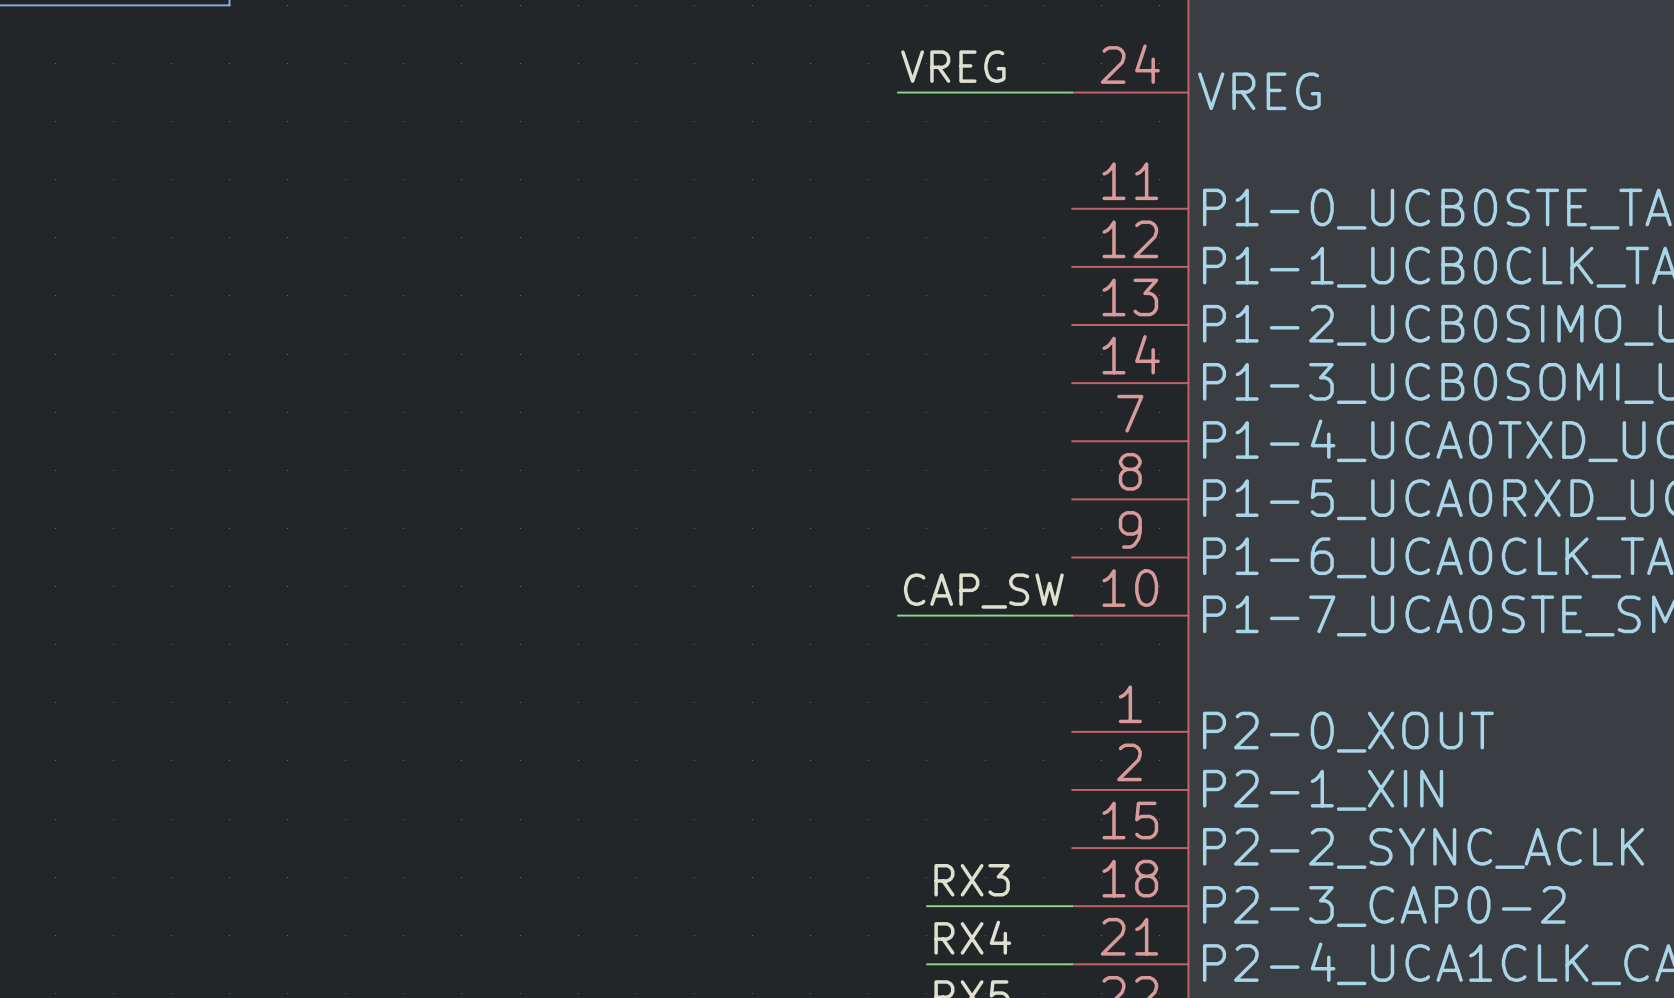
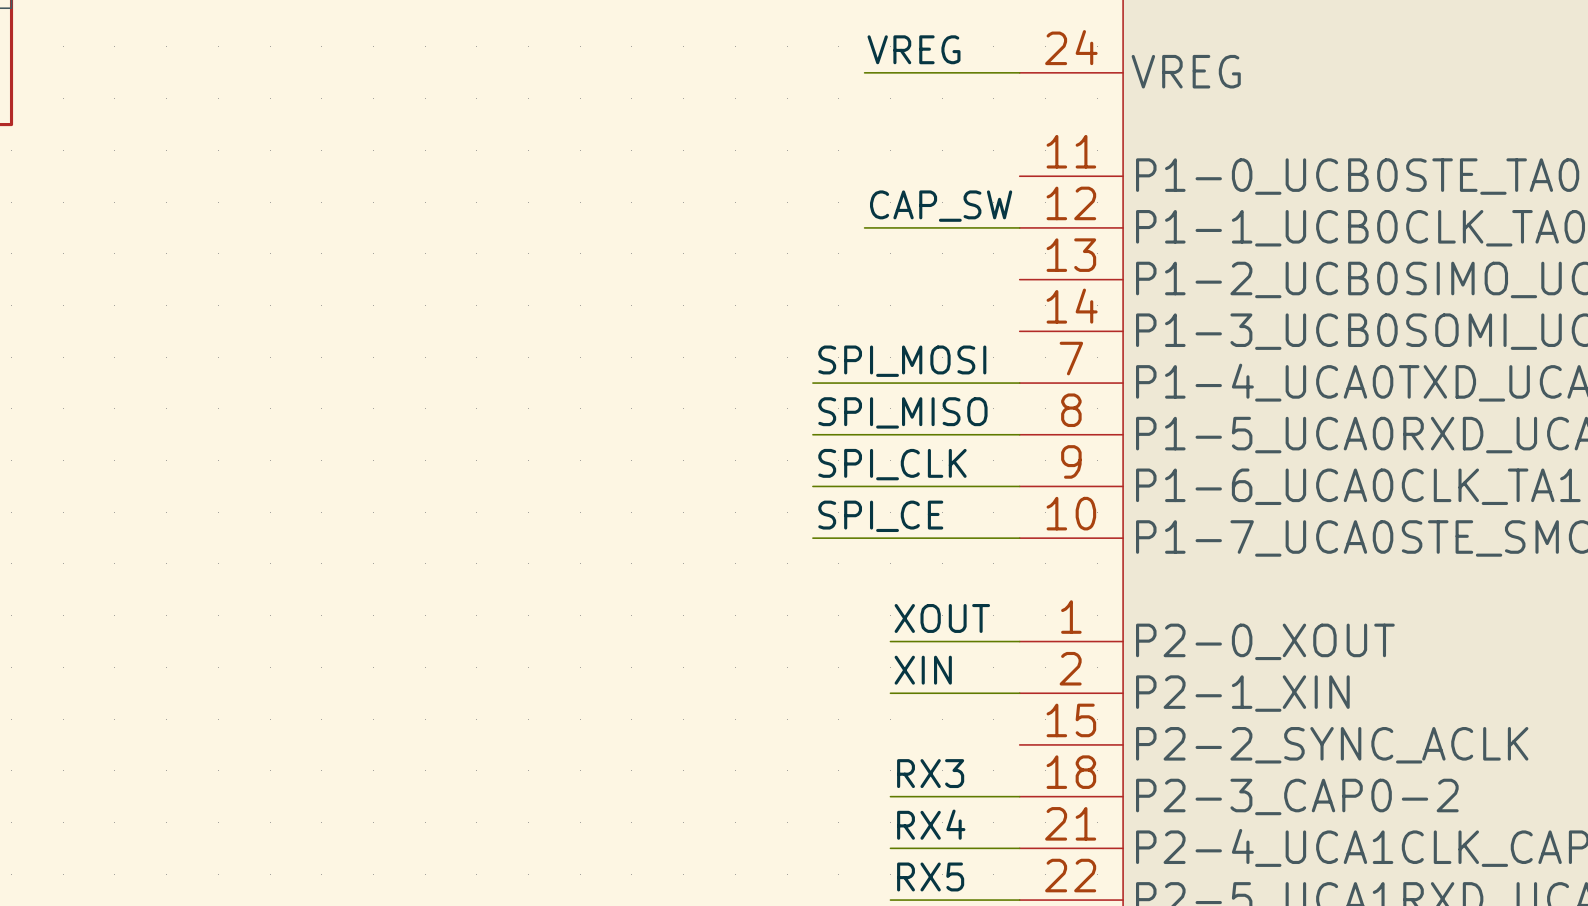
wire: none -> (864, 227) (1019, 227)
label: none -> SPI_MOSI (902, 361)
wire: none -> (812, 383) (1019, 383)
label: none -> SPI_MISO (902, 412)
wire: none -> (812, 434) (1019, 434)
label: none -> SPI_CLK (892, 464)
wire: none -> (812, 486) (1019, 486)
label: none -> SPI_CE (880, 516)
label position: CAP_SW (983, 591) -> CAP_SW (941, 206)
wire: none -> (812, 538) (864, 538)
label: none -> XOUT (942, 618)
wire: none -> (890, 641) (1019, 641)
label: none -> XIN (923, 670)
wire: none -> (890, 693) (1019, 693)

